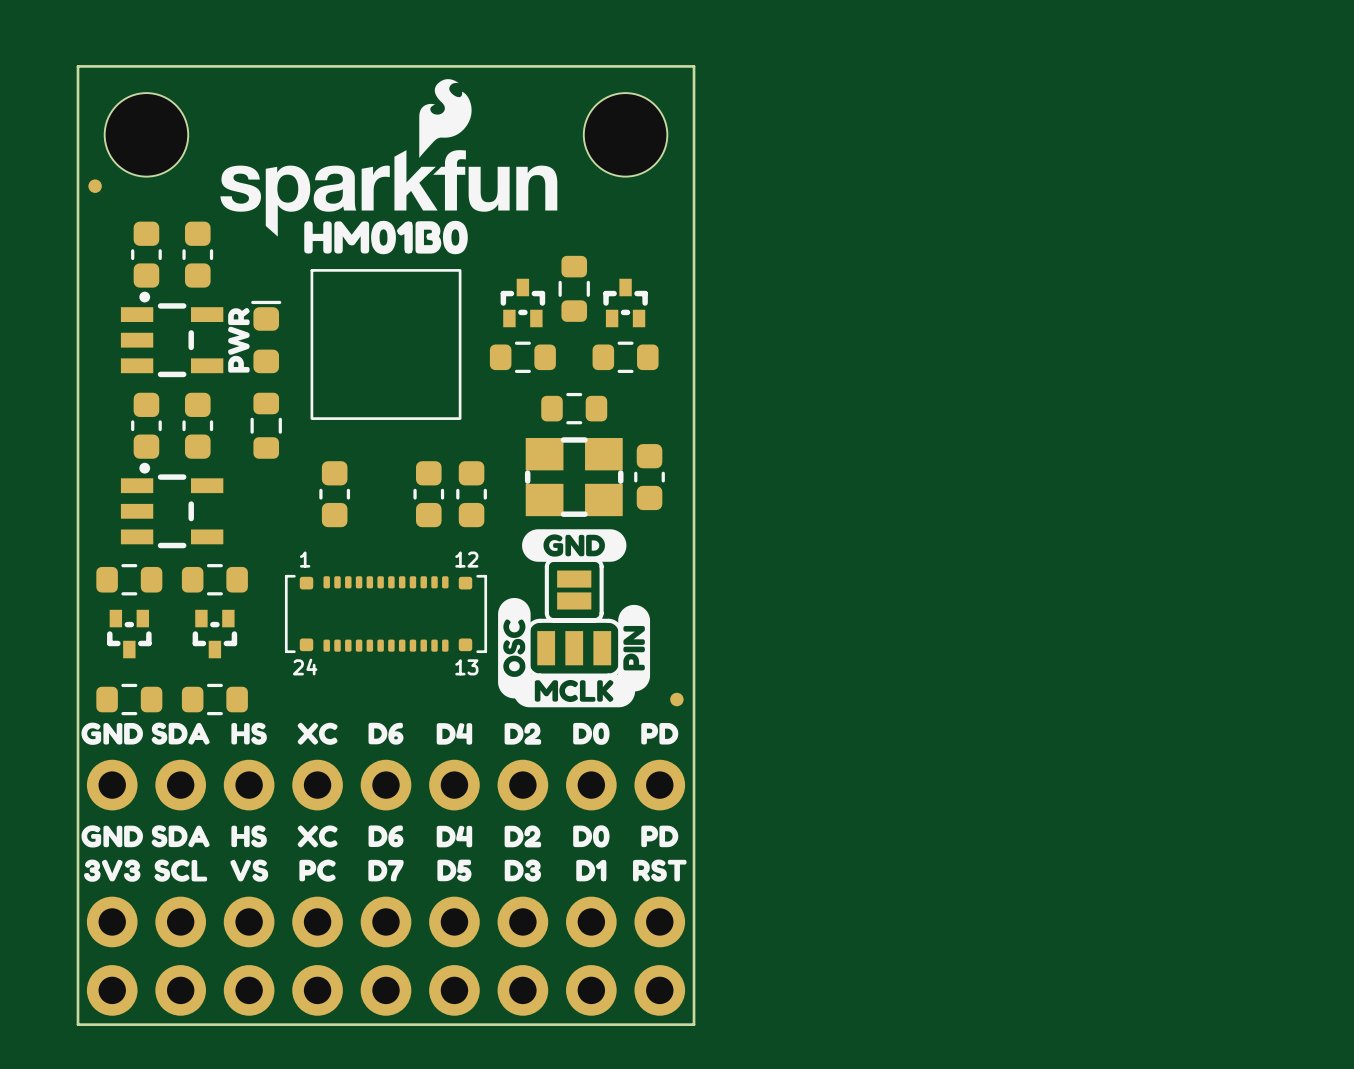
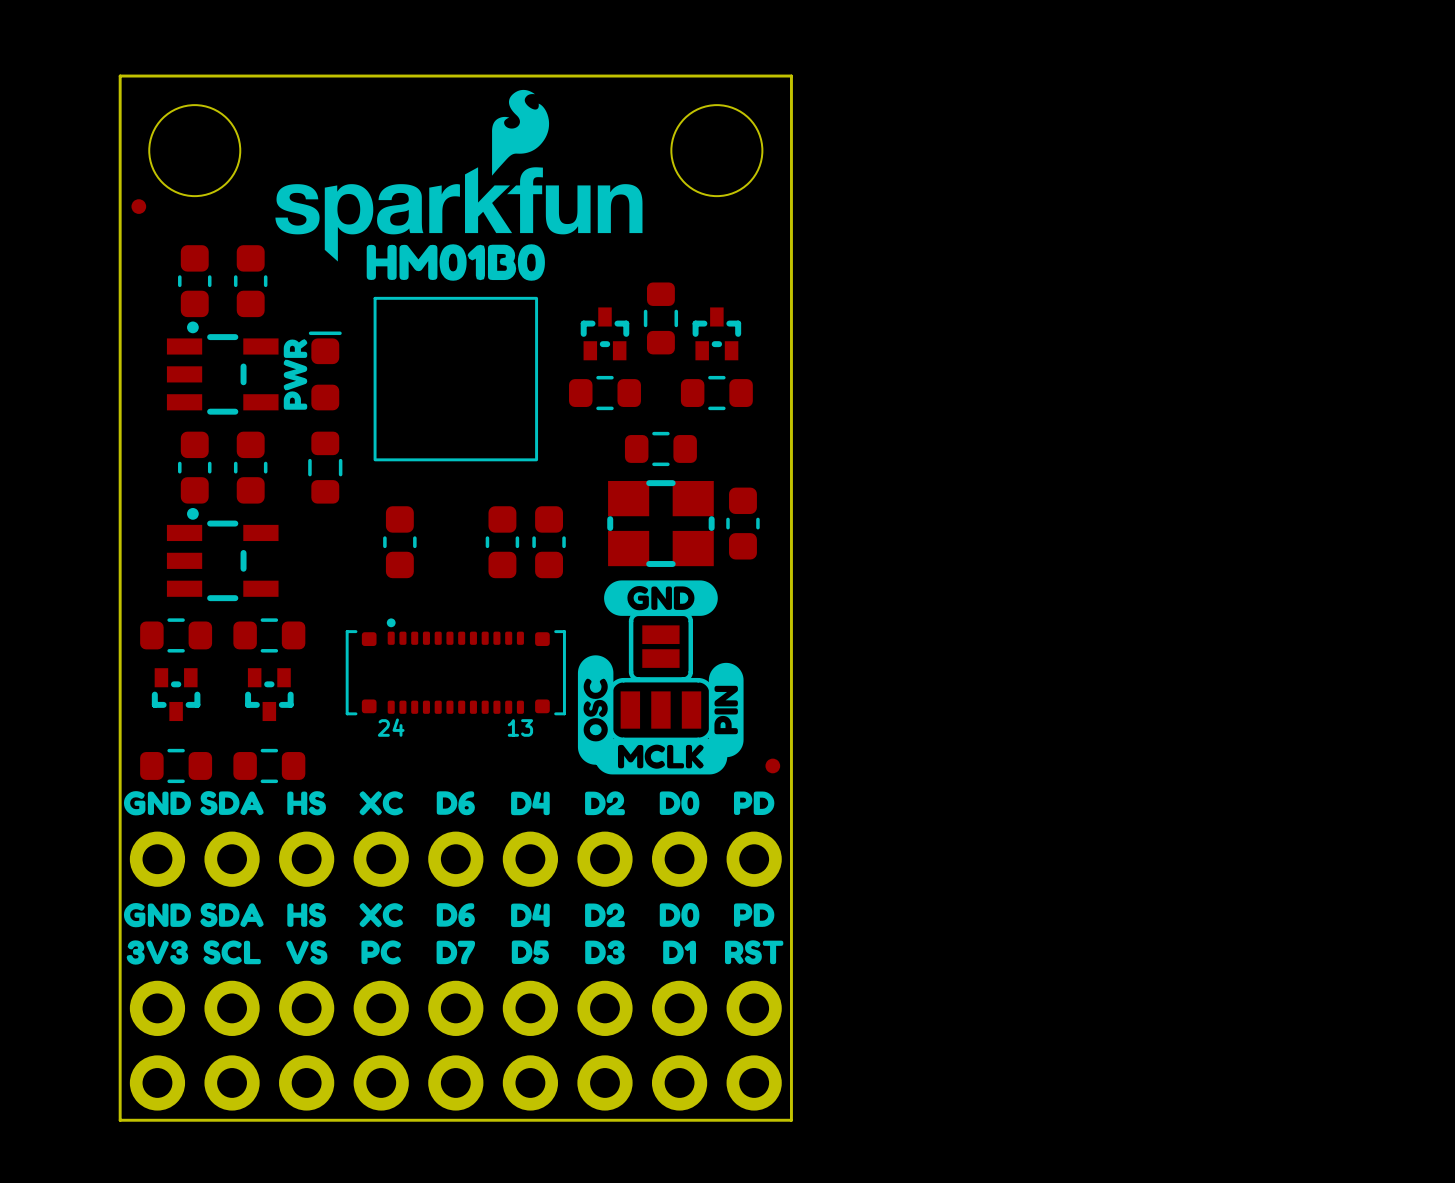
part footprint: [284, 574, 488, 654] -> [345, 618, 566, 716]

